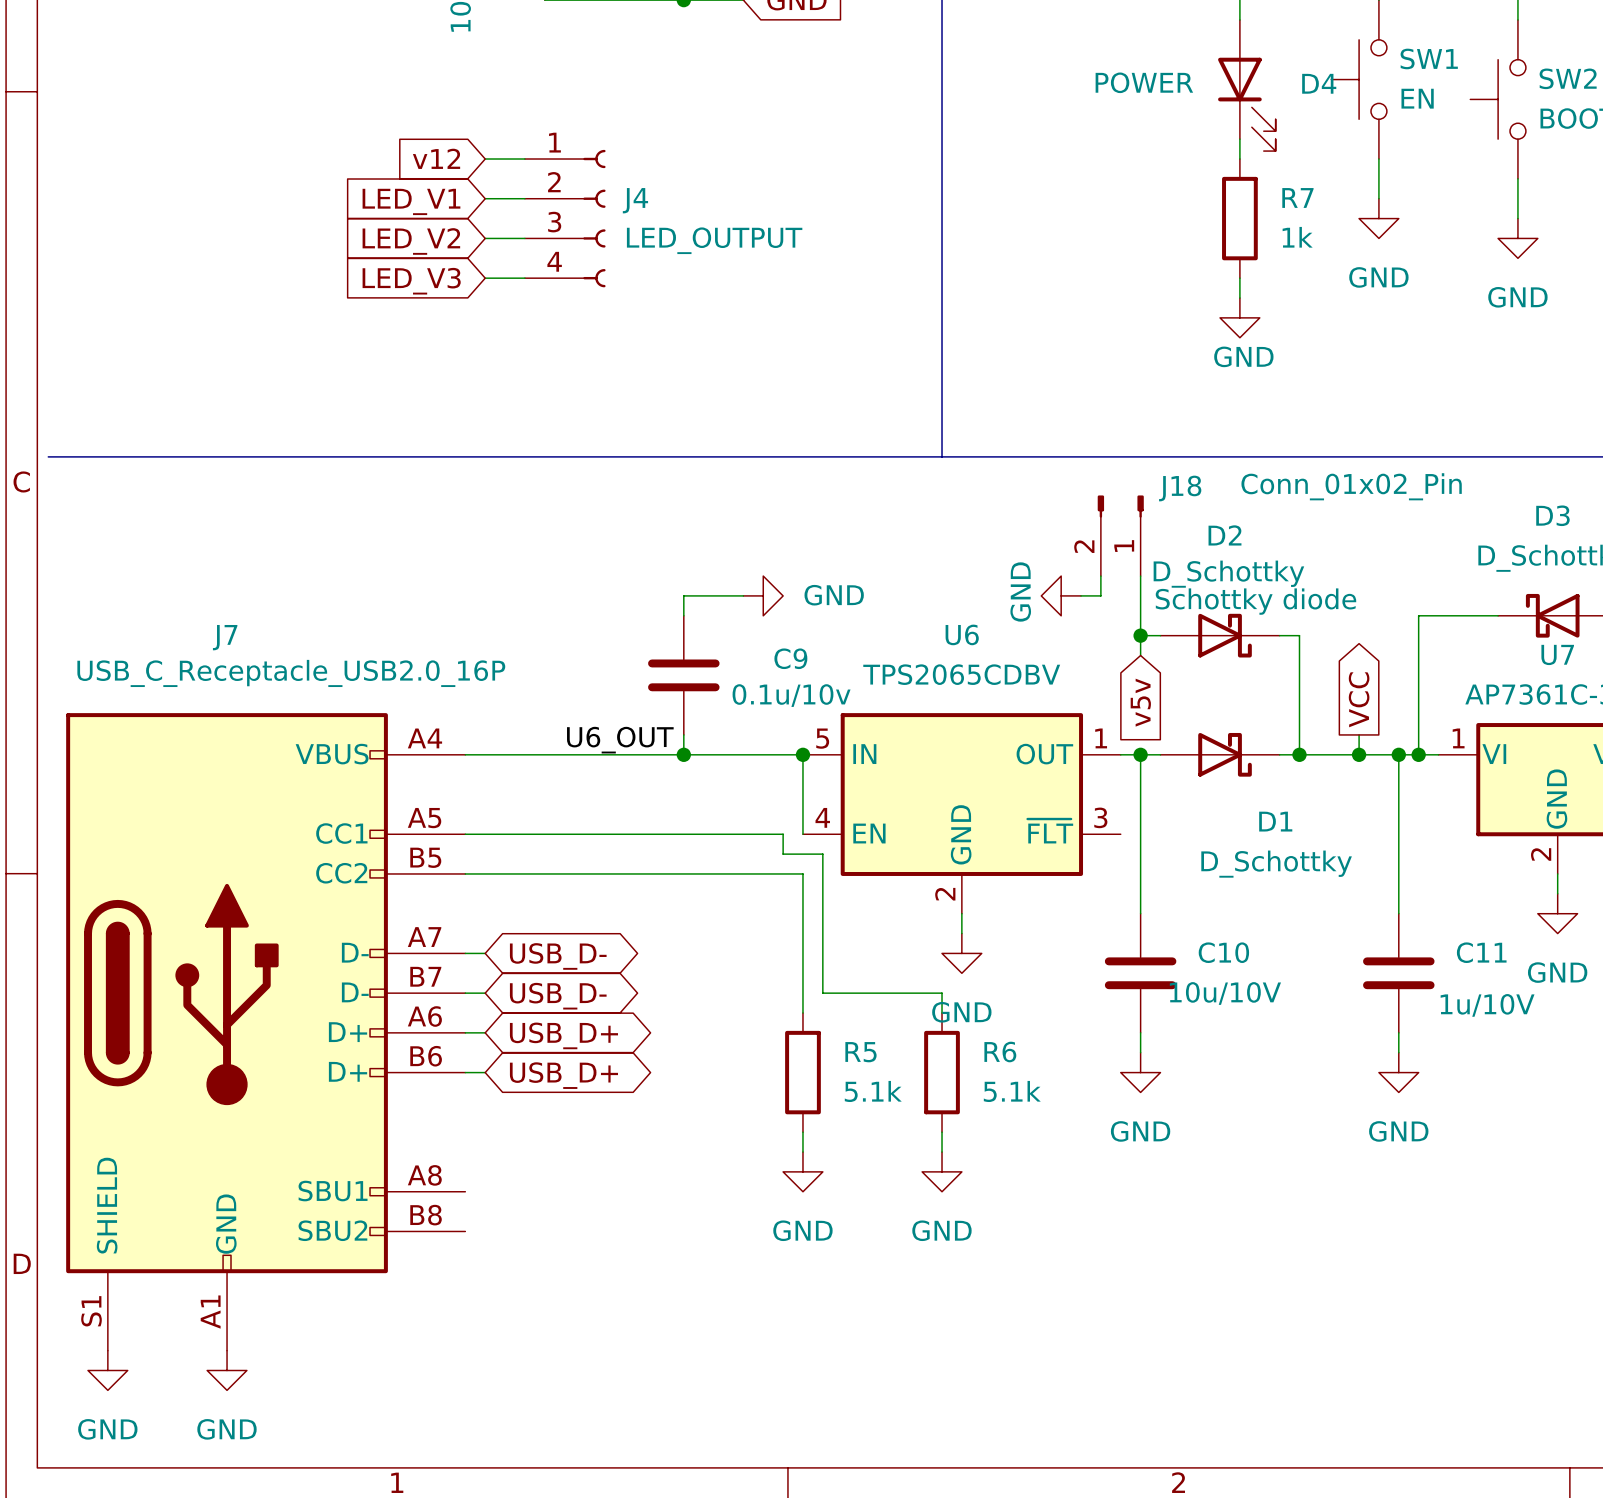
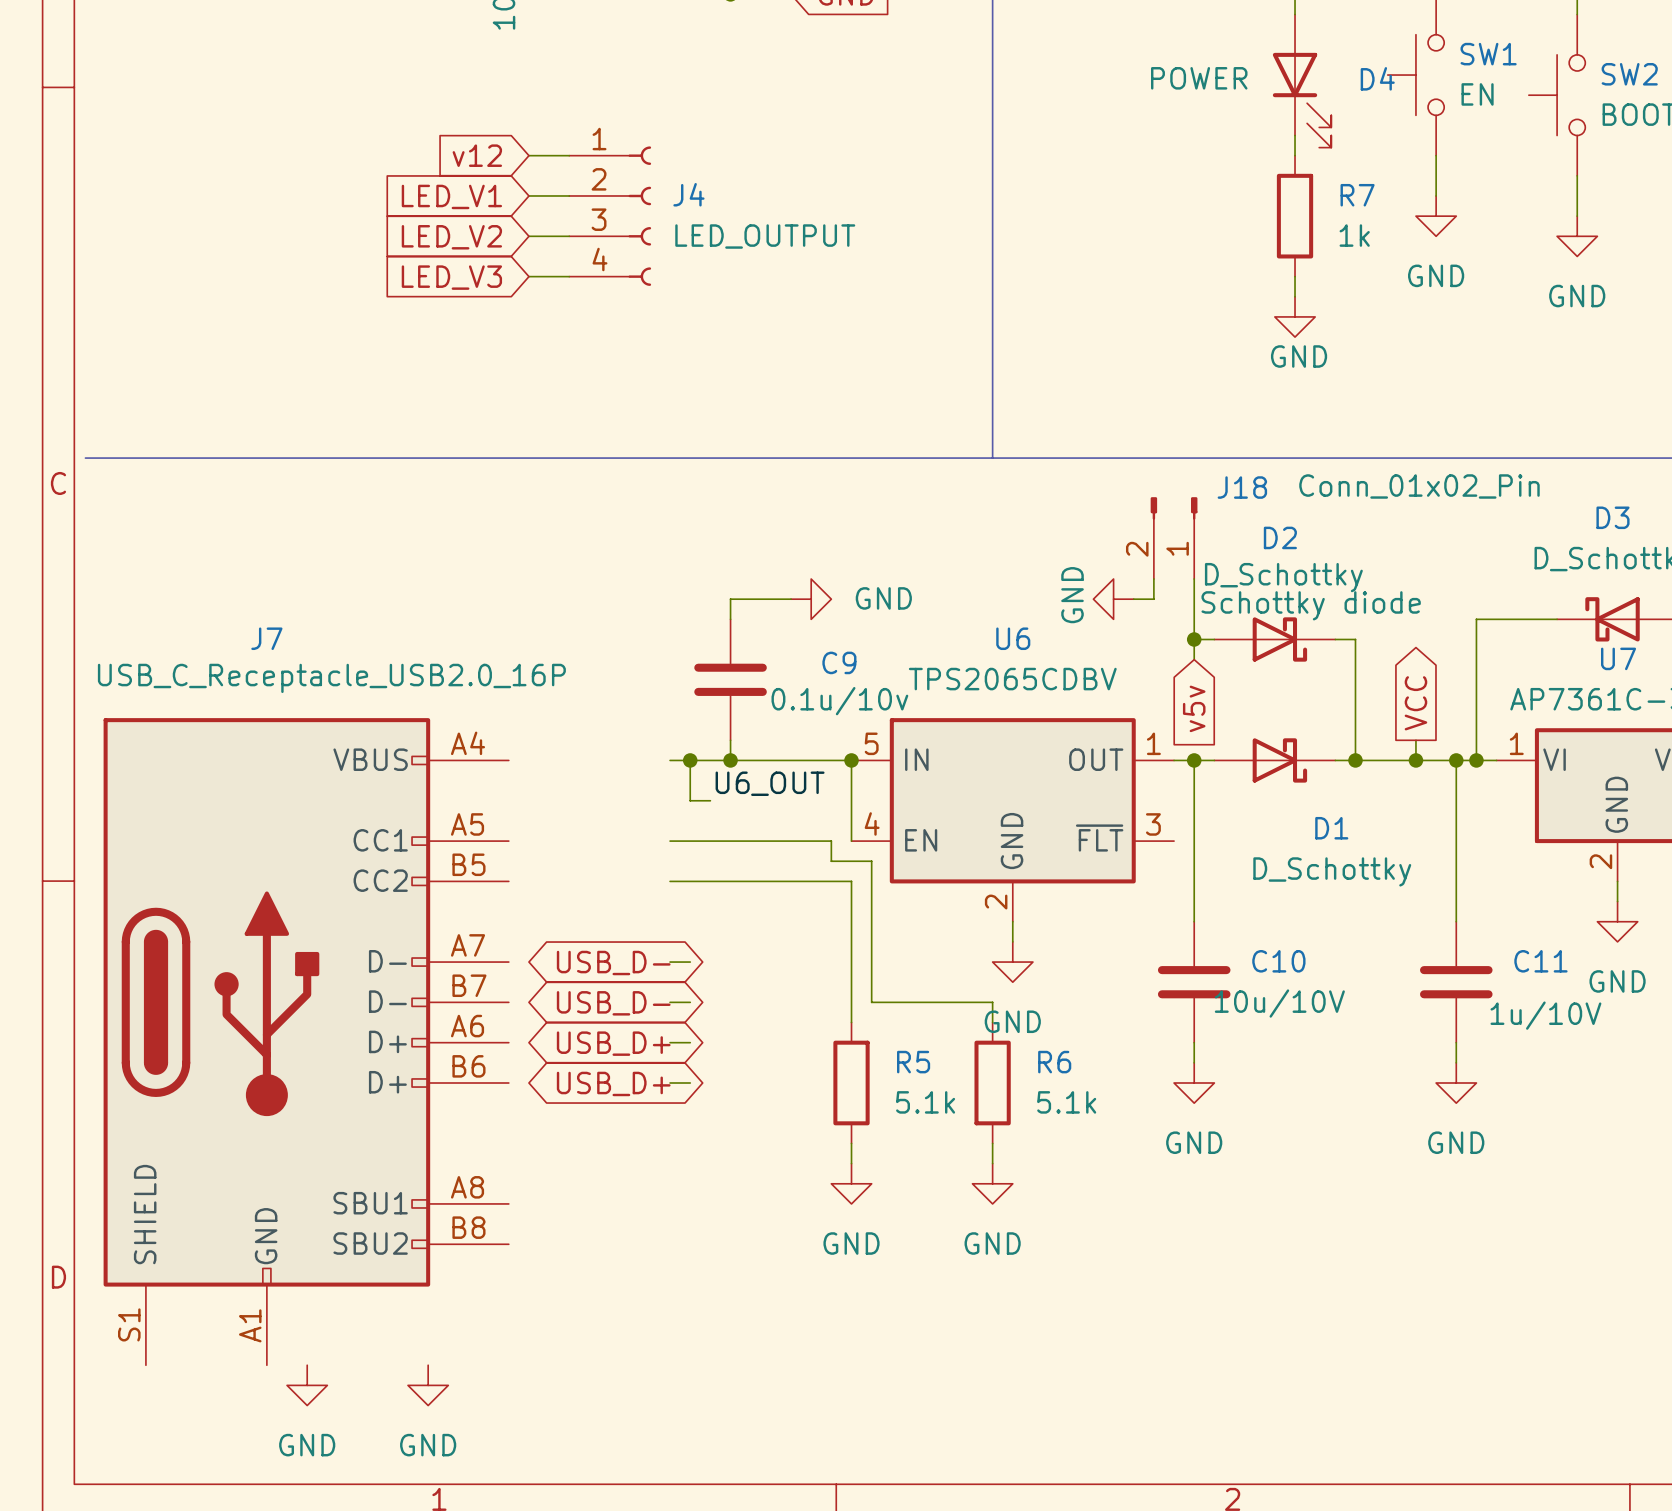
label position: U6_OUT (620, 740) -> U6_OUT (770, 783)
wire: (465, 754) (624, 754) -> none
wire: none -> (690, 760) (690, 800) (710, 800)
junction: none -> (690, 760)
wire: (465, 834) (624, 834) -> none
wire: (465, 873) (624, 873) -> none
wire: (465, 953) (485, 953) -> (670, 962) (690, 962)
wire: (465, 993) (485, 993) -> (670, 1002) (690, 1002)
wire: (465, 1032) (485, 1032) -> (670, 1042) (690, 1042)
wire: (465, 1072) (485, 1072) -> (670, 1083) (690, 1083)
power symbol: GND (107, 1370) -> none
power symbol position: GND (227, 1370) -> GND (307, 1385)
power symbol: none -> GND (428, 1385)

